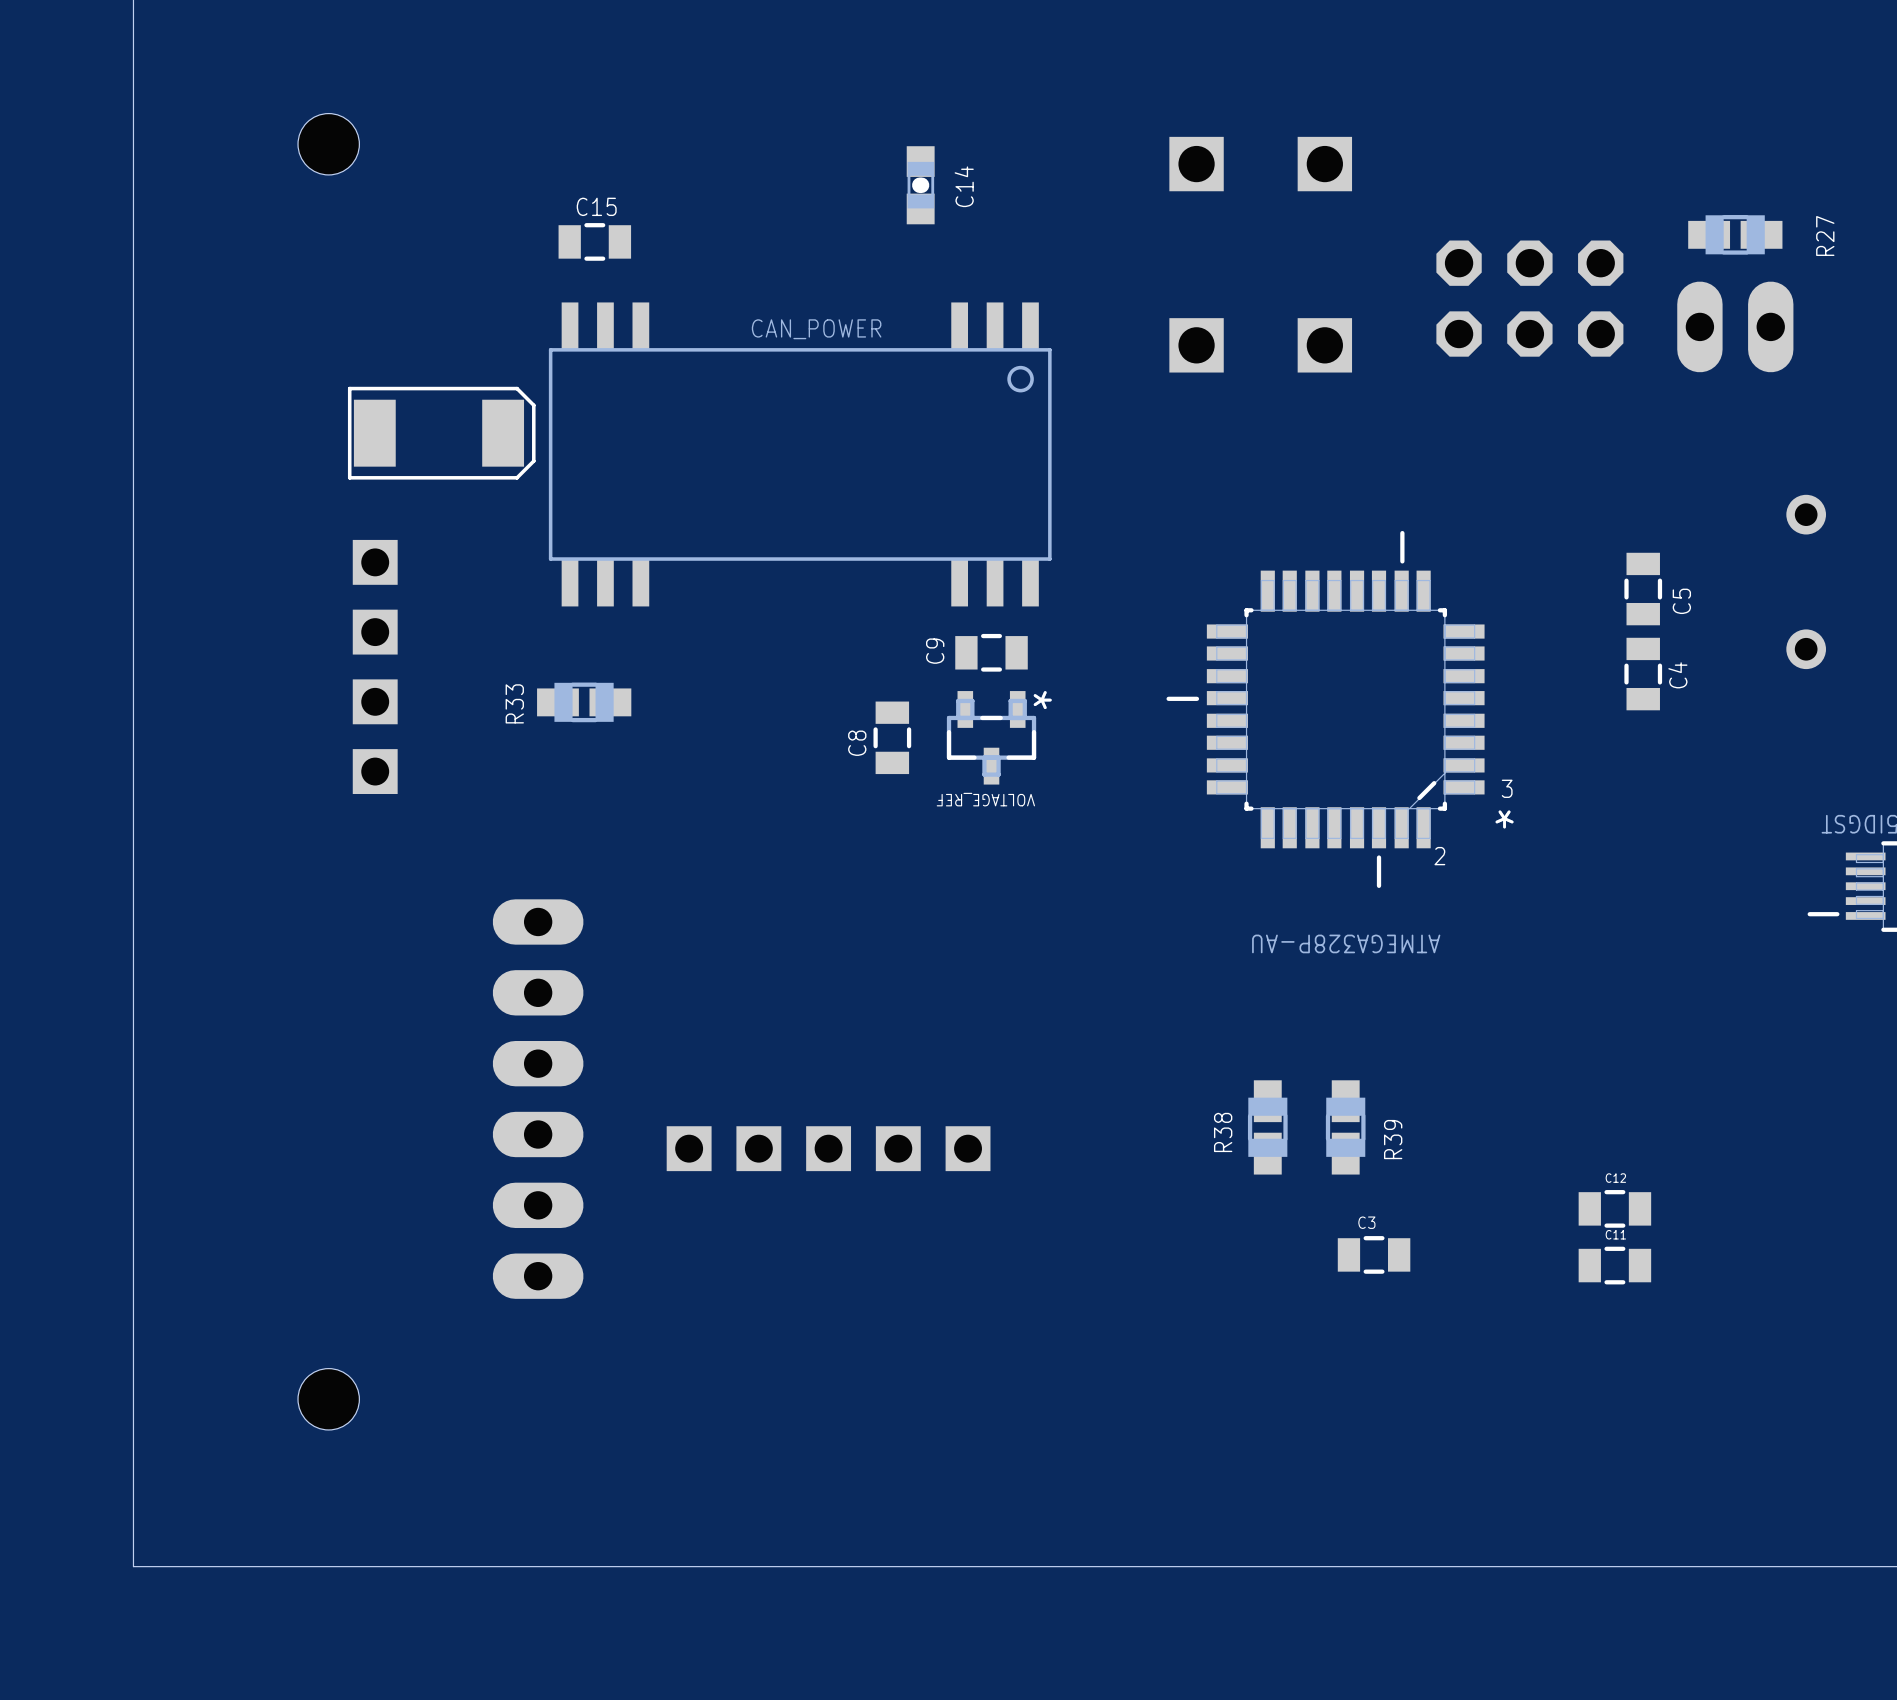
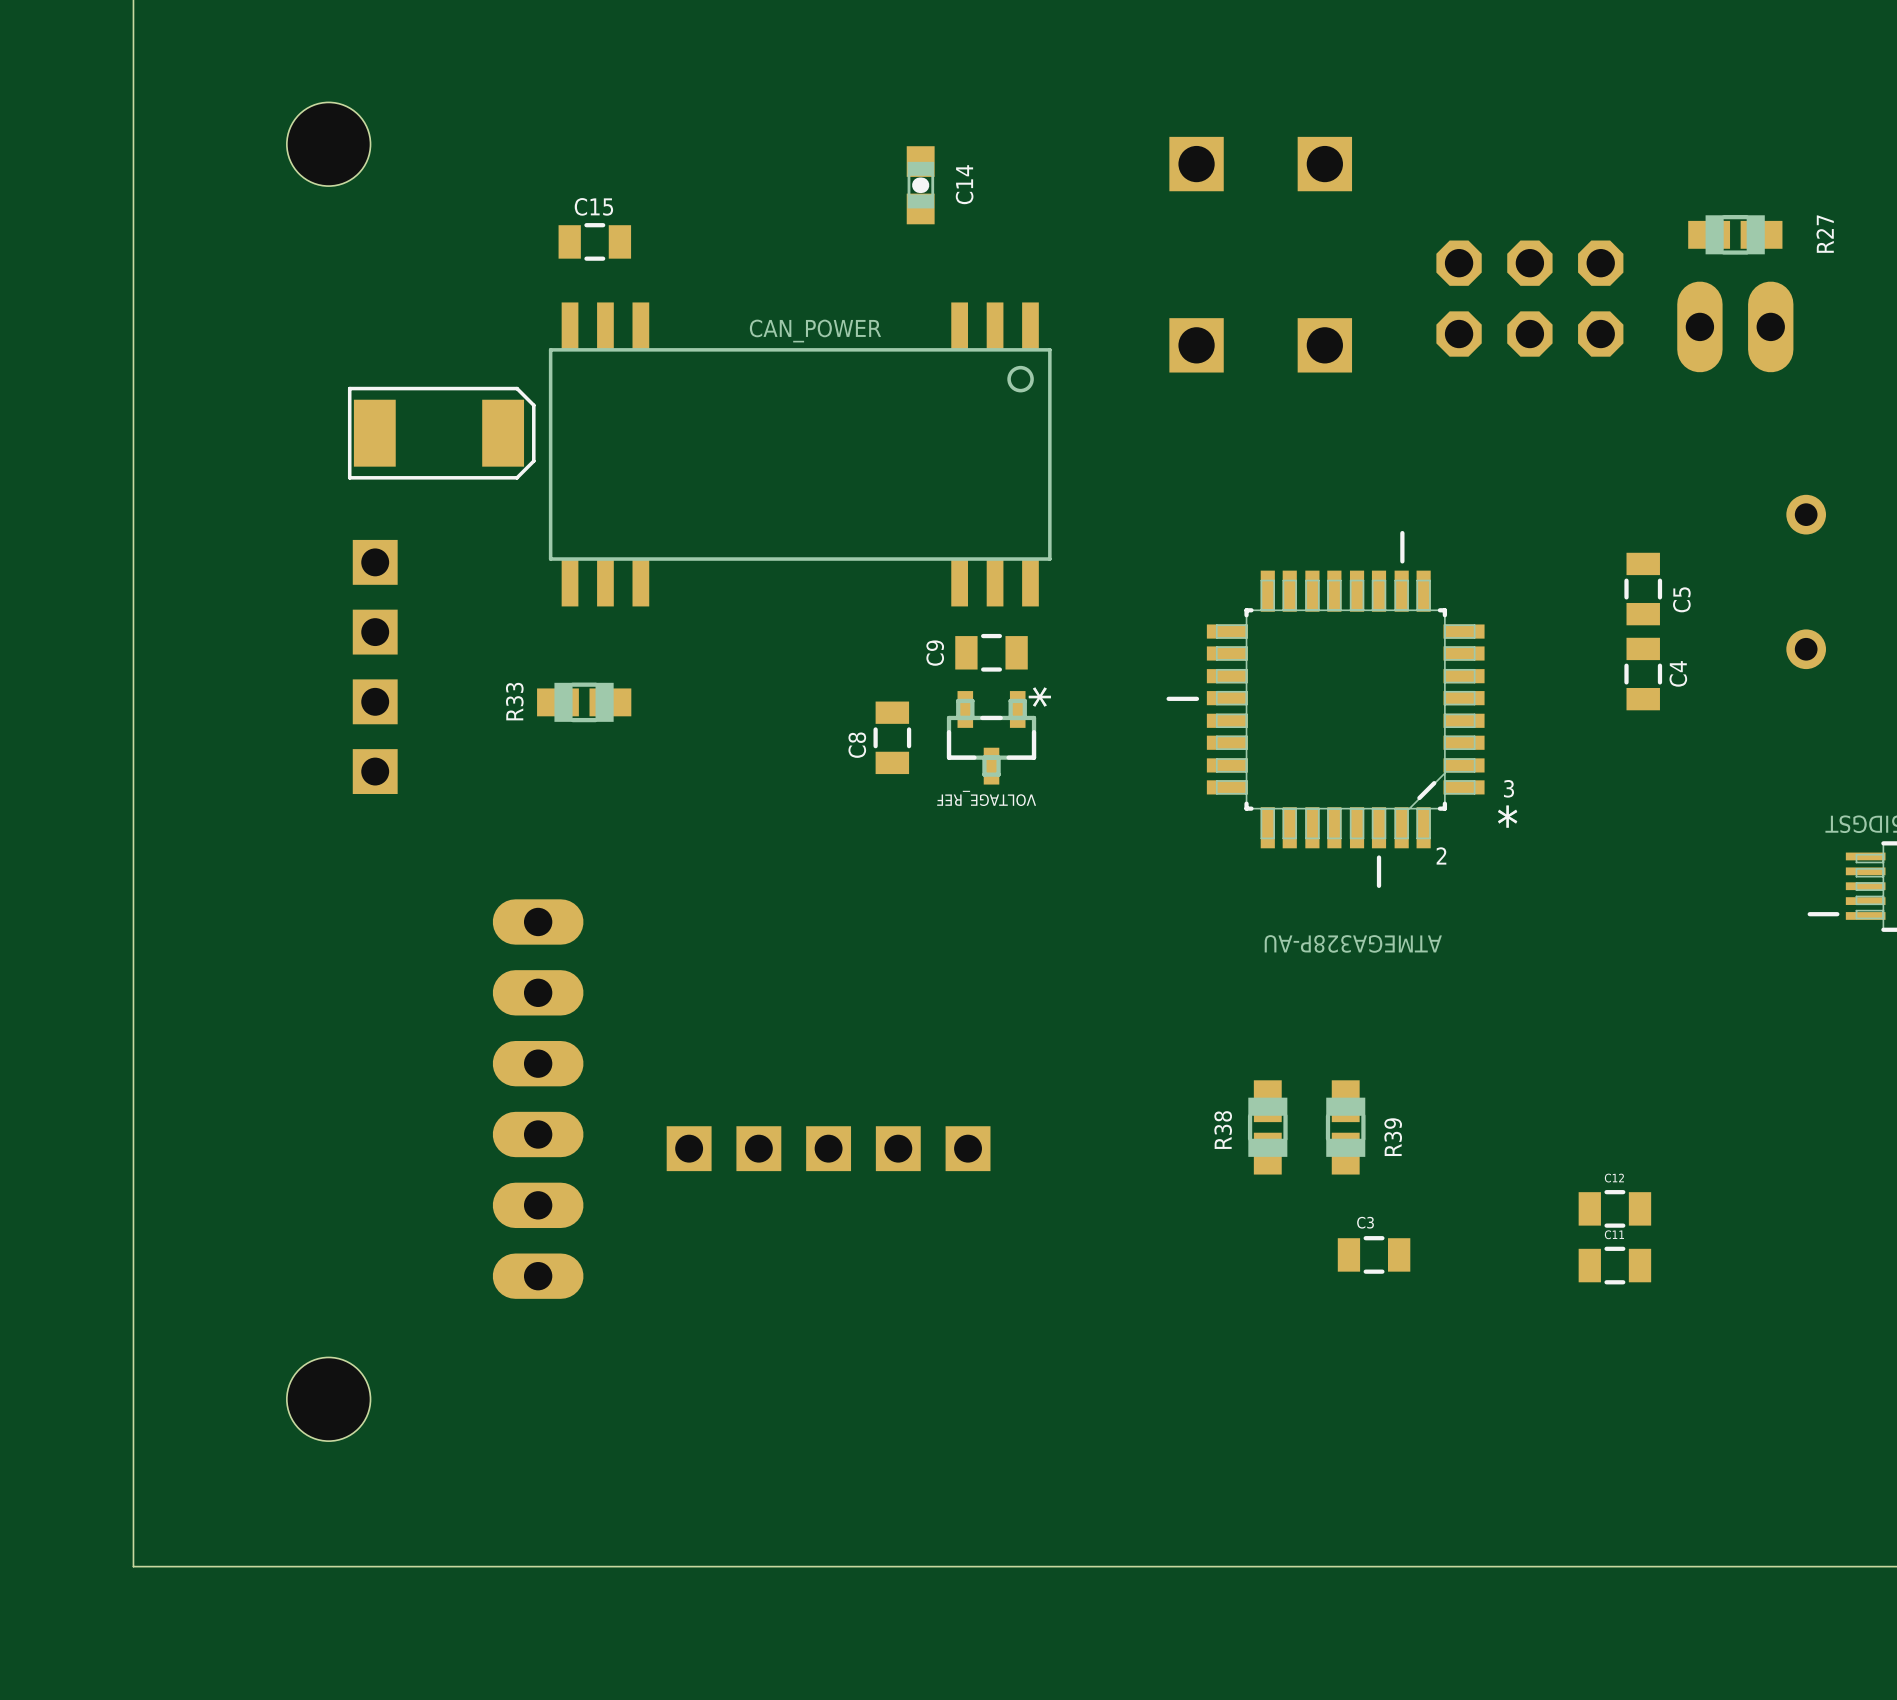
hole size: [298, 113, 360, 175] -> [286, 102, 371, 187]
hole size: [298, 1368, 360, 1430] -> [286, 1357, 371, 1442]

